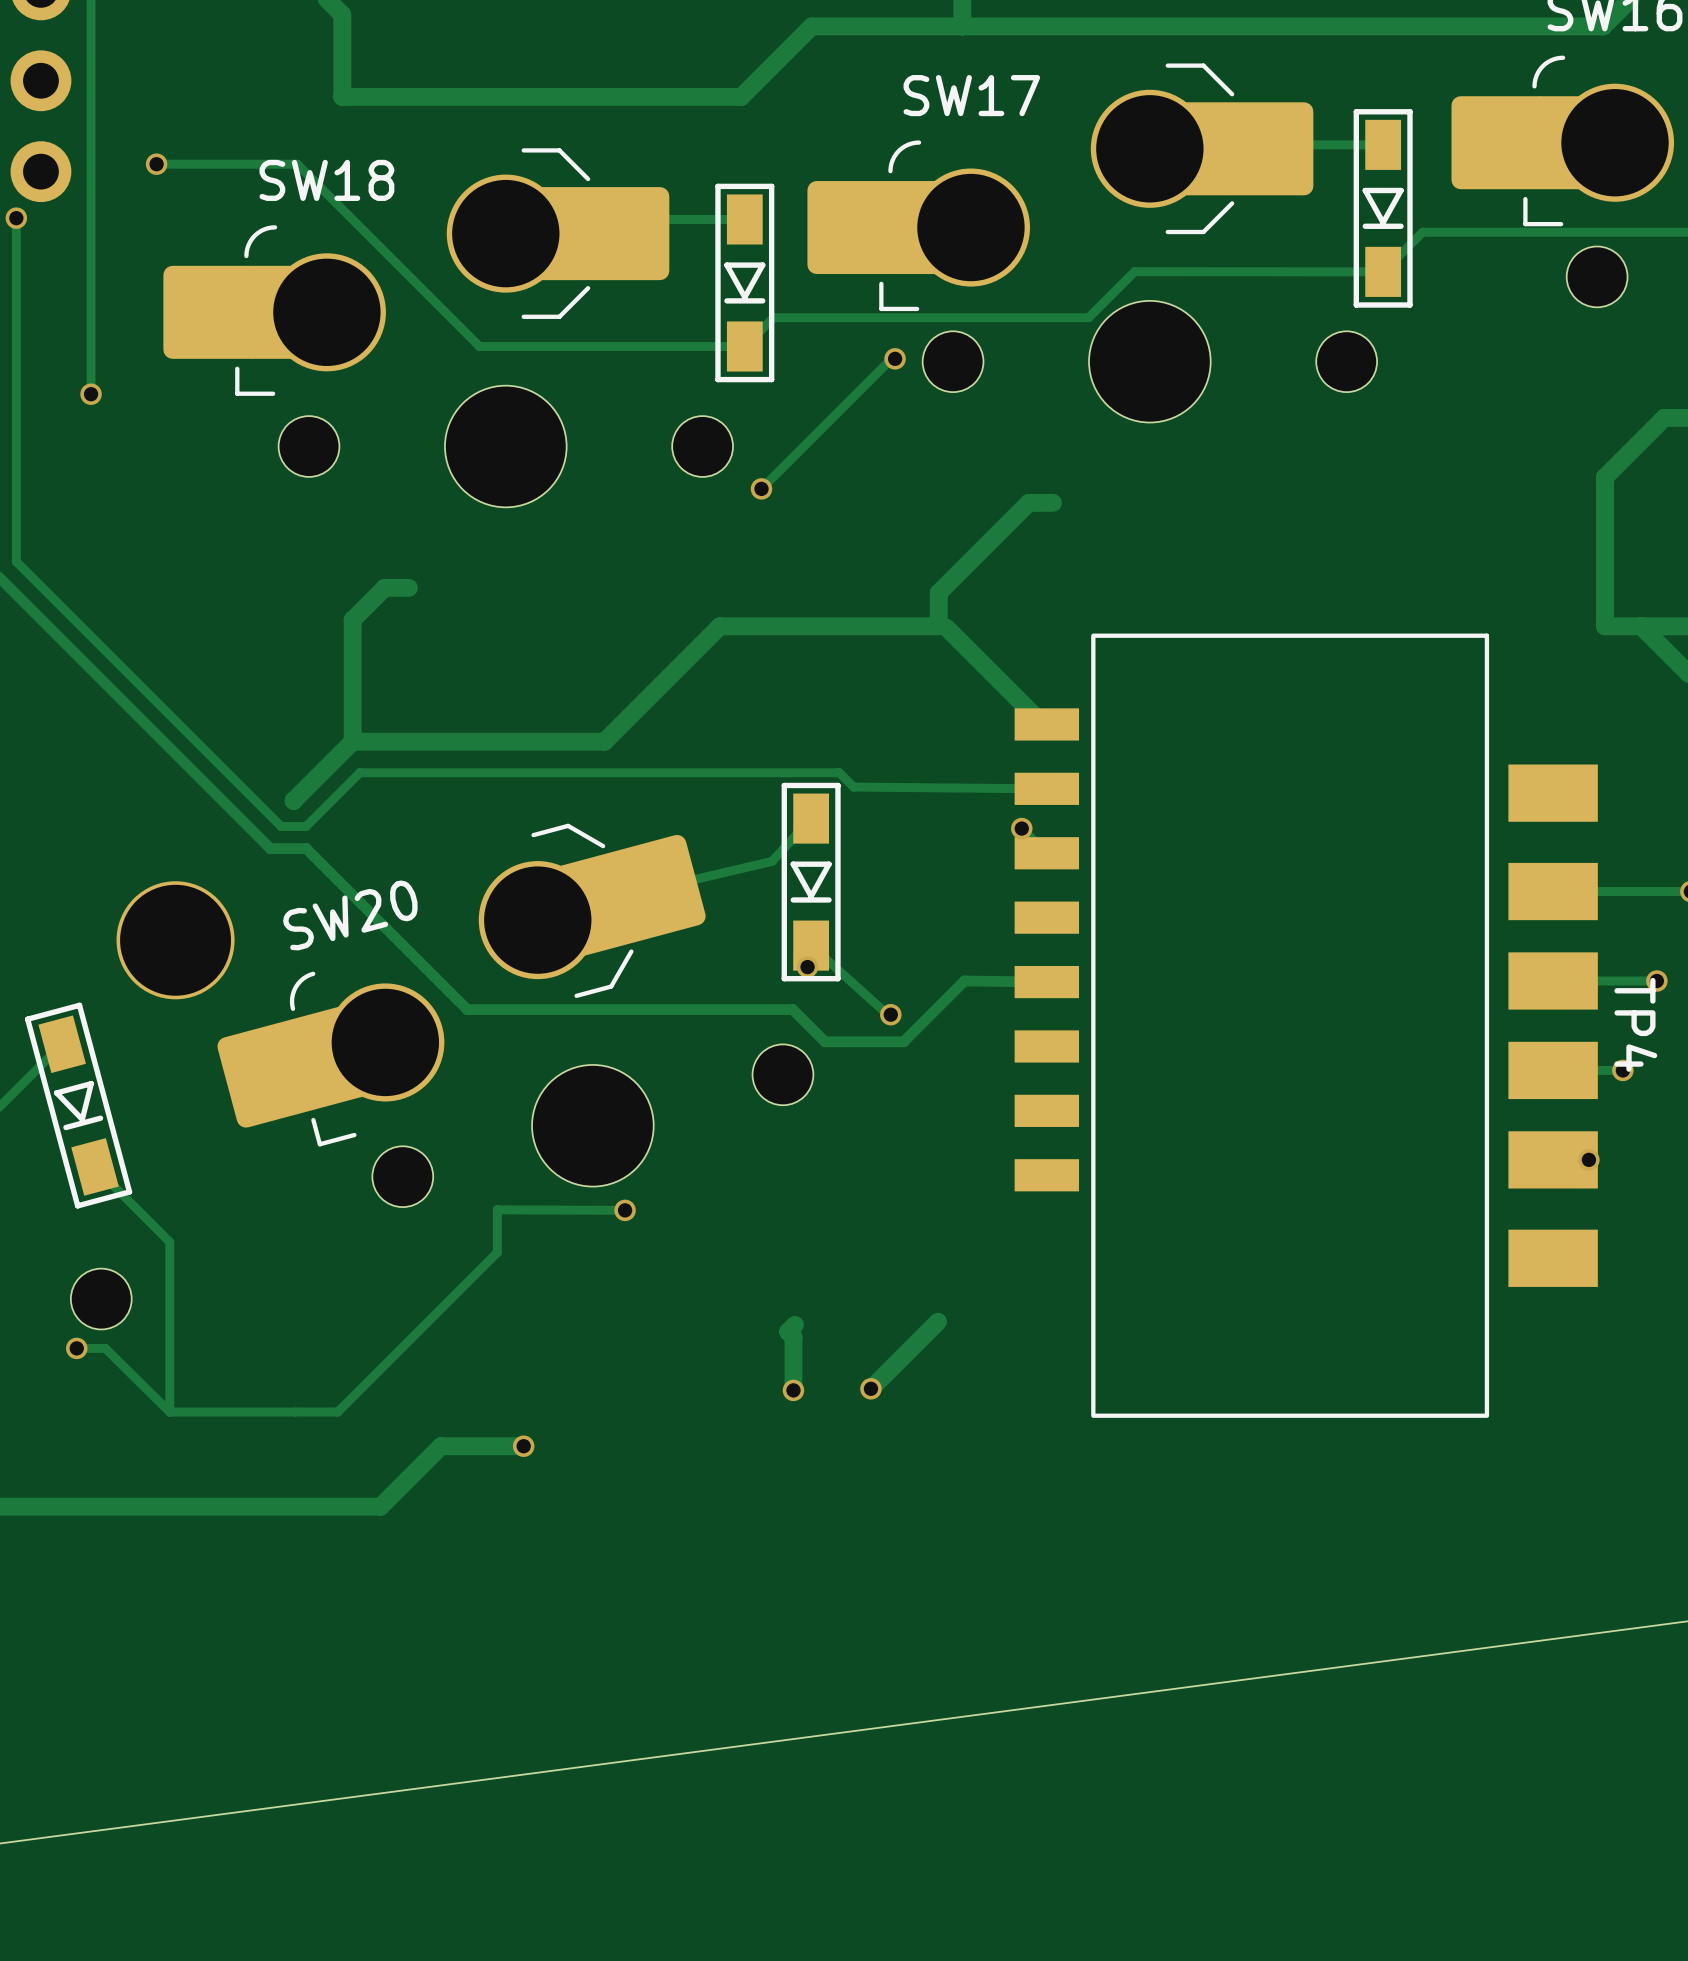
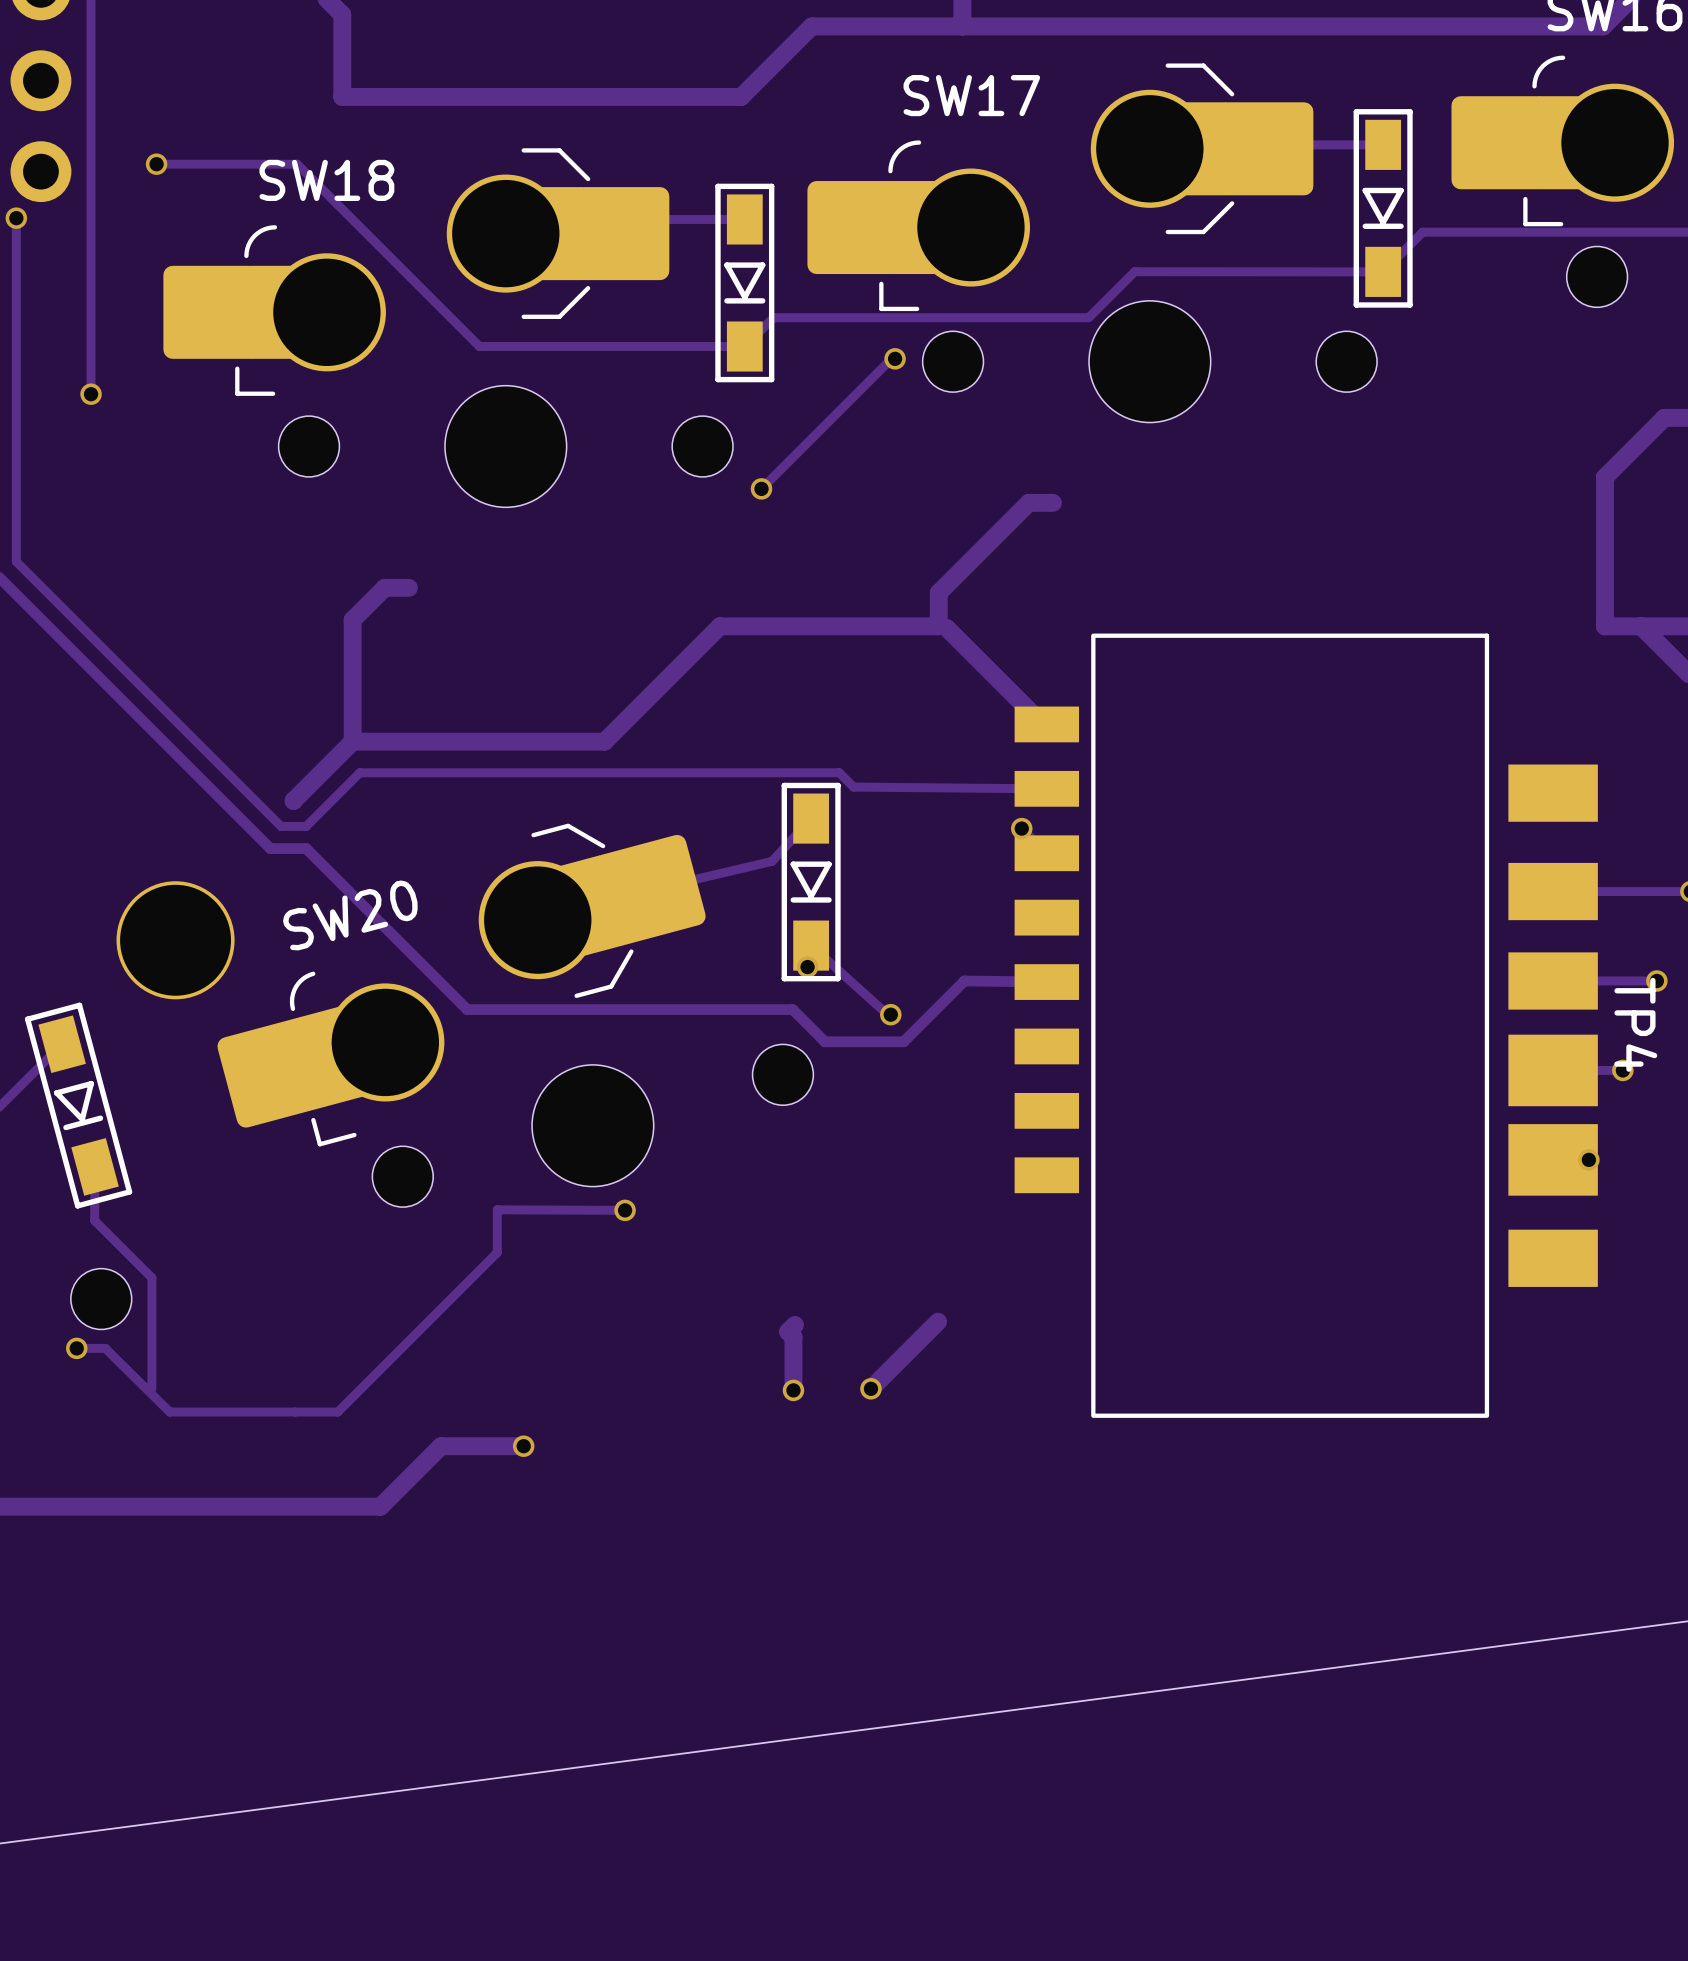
TP4 footprint: [1014, 633, 1598, 1418] -> [1014, 633, 1598, 1418]
track: none -> (95, 1166) (94, 1220) (151, 1277) (151, 1388)
track: (112, 1184) (169, 1242) (169, 1412) -> none

